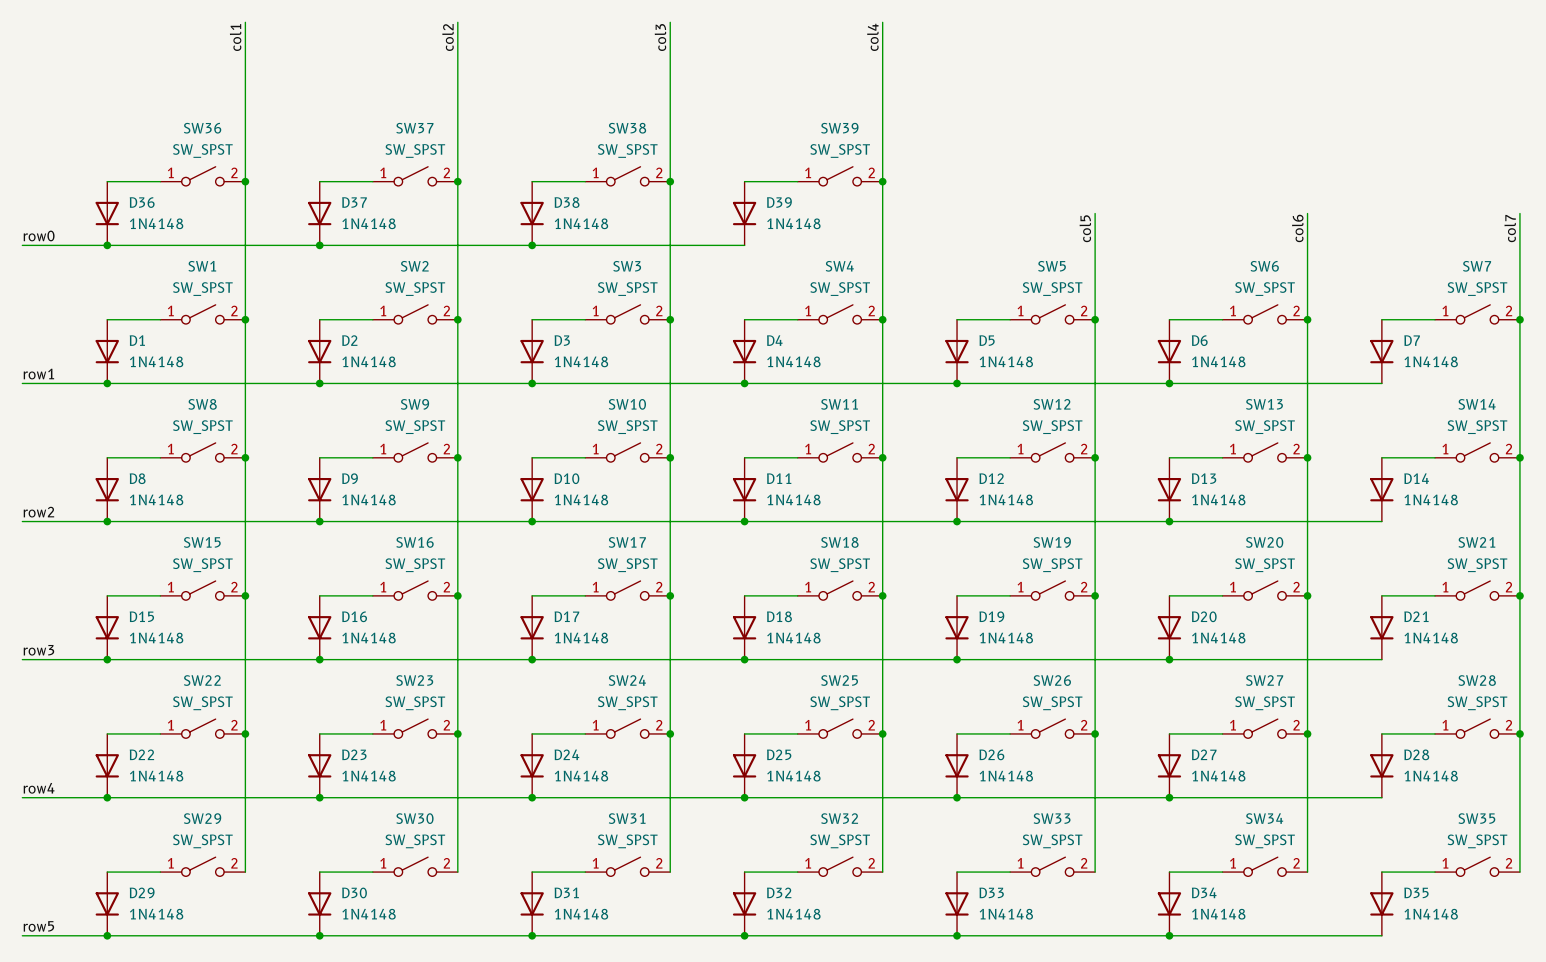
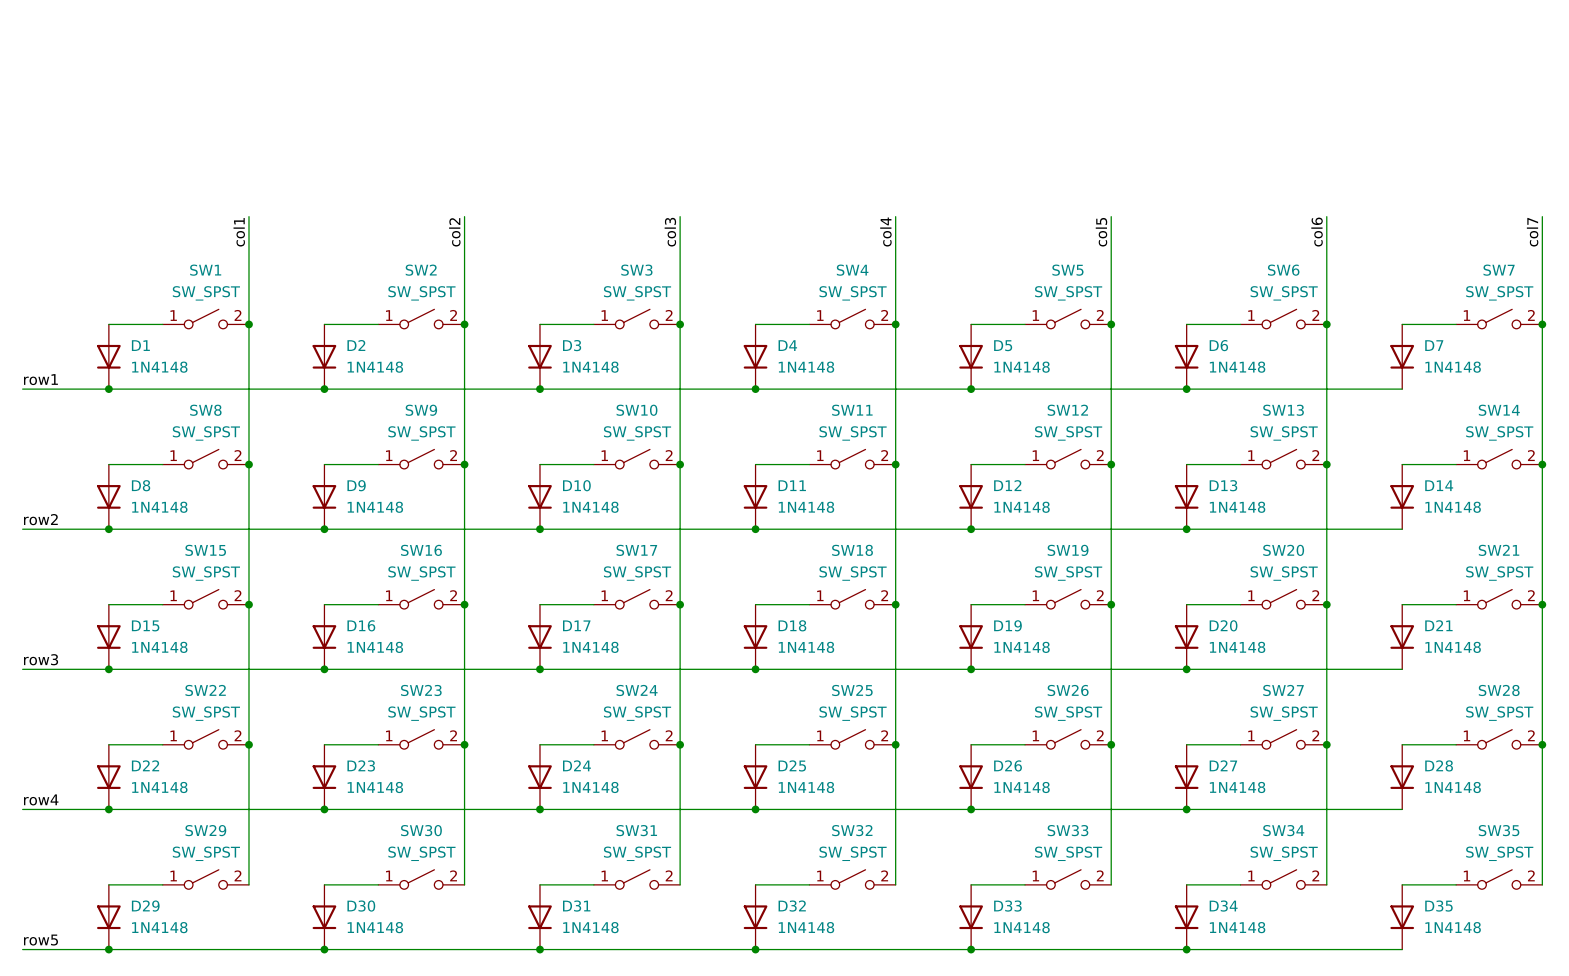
wire: (245, 22) (245, 213) -> none
wire: (457, 22) (457, 213) -> none
wire: (670, 22) (670, 213) -> none
wire: (882, 22) (882, 213) -> none
label position: col1 (235, 37) -> col1 (239, 232)
label position: col2 (448, 37) -> col2 (454, 232)
label position: col3 (660, 37) -> col3 (670, 232)
label position: col4 (872, 37) -> col4 (885, 232)
SW36: SW_SPST (202, 176) -> none
SW37: SW_SPST (415, 176) -> none
SW38: SW_SPST (627, 176) -> none
SW39: SW_SPST (840, 176) -> none
wire: (107, 181) (160, 181) -> none
junction: (245, 181) -> none
wire: (319, 181) (372, 181) -> none
junction: (457, 181) -> none
wire: (532, 181) (585, 181) -> none
junction: (670, 181) -> none
wire: (744, 181) (797, 181) -> none
junction: (882, 181) -> none
D36: 1N4148 (107, 213) -> none
D37: 1N4148 (319, 213) -> none
D38: 1N4148 (532, 213) -> none
D39: 1N4148 (744, 213) -> none
label: row0 (39, 235) -> none
wire: (22, 245) (744, 245) -> none
junction: (107, 245) -> none
junction: (319, 245) -> none
junction: (532, 245) -> none

